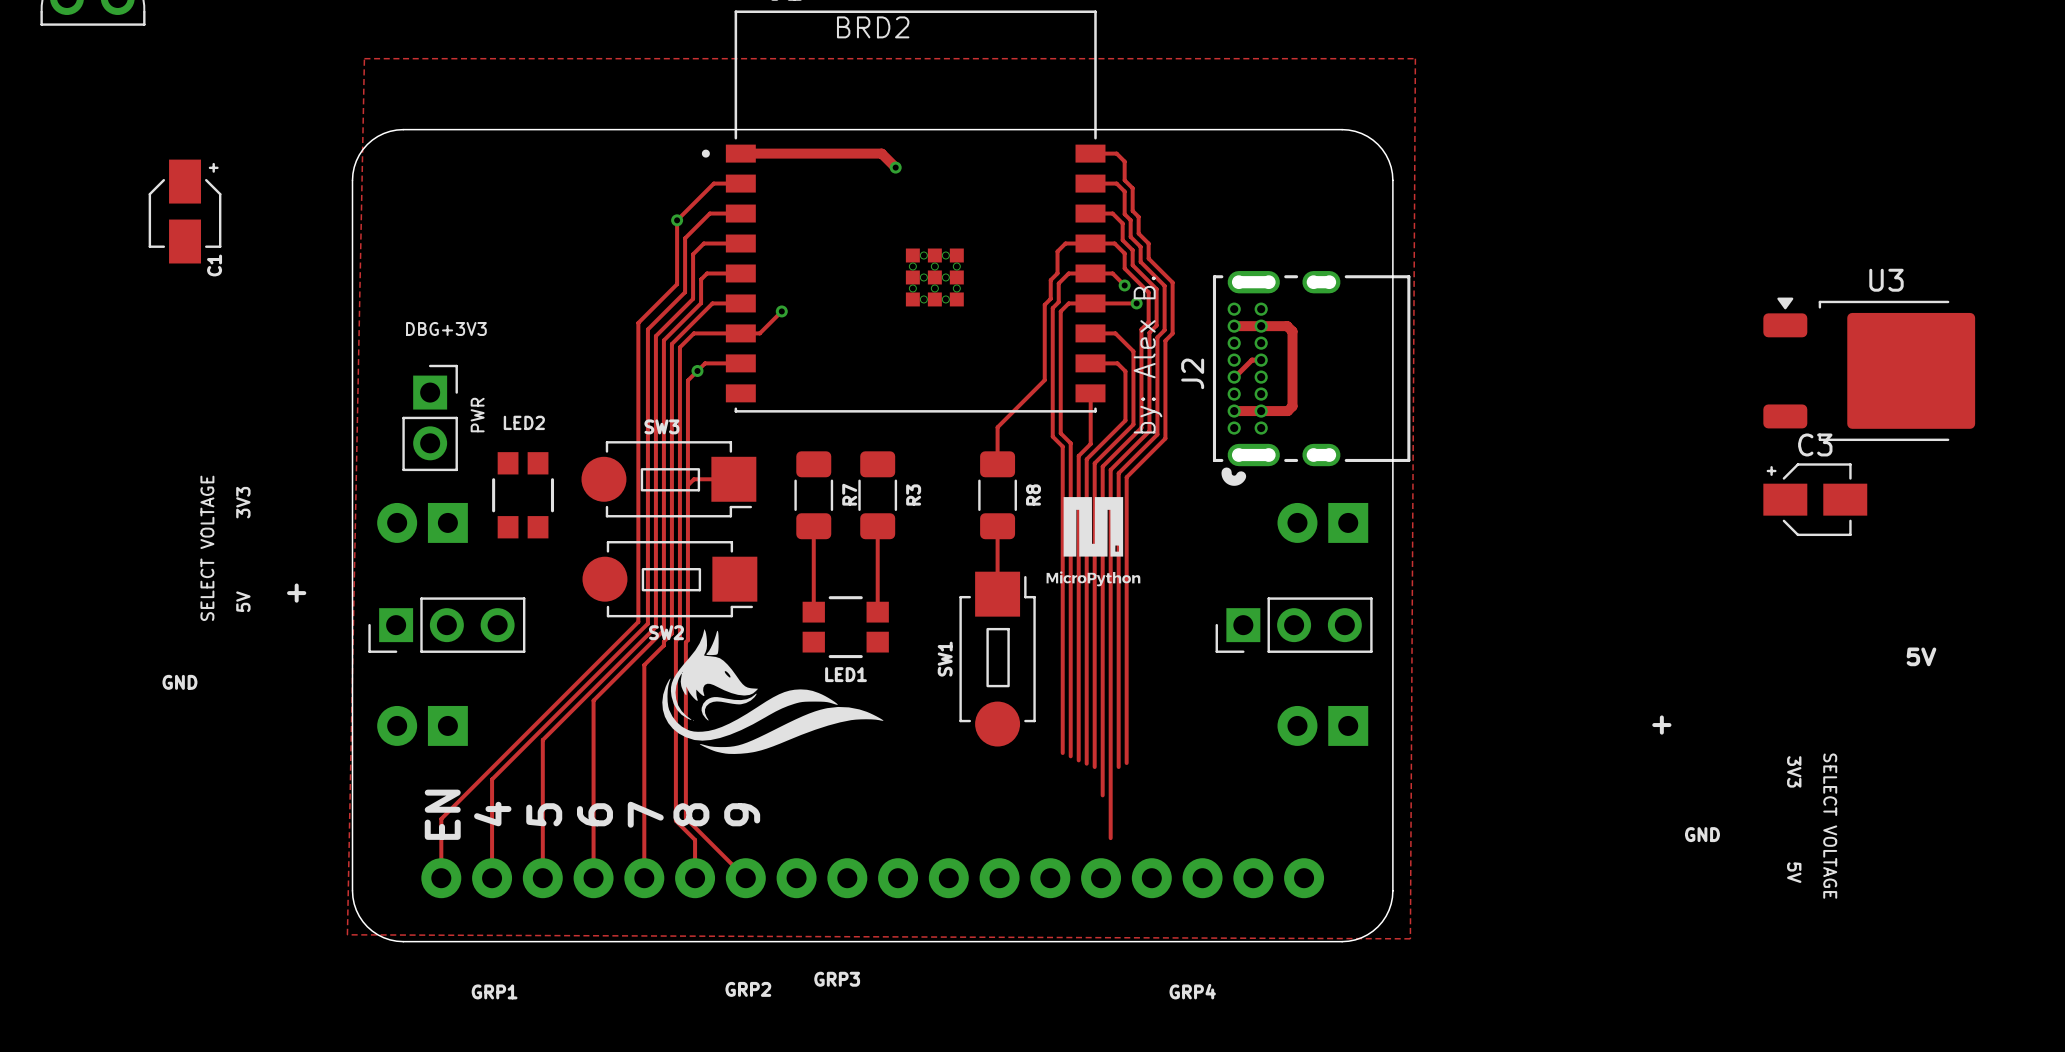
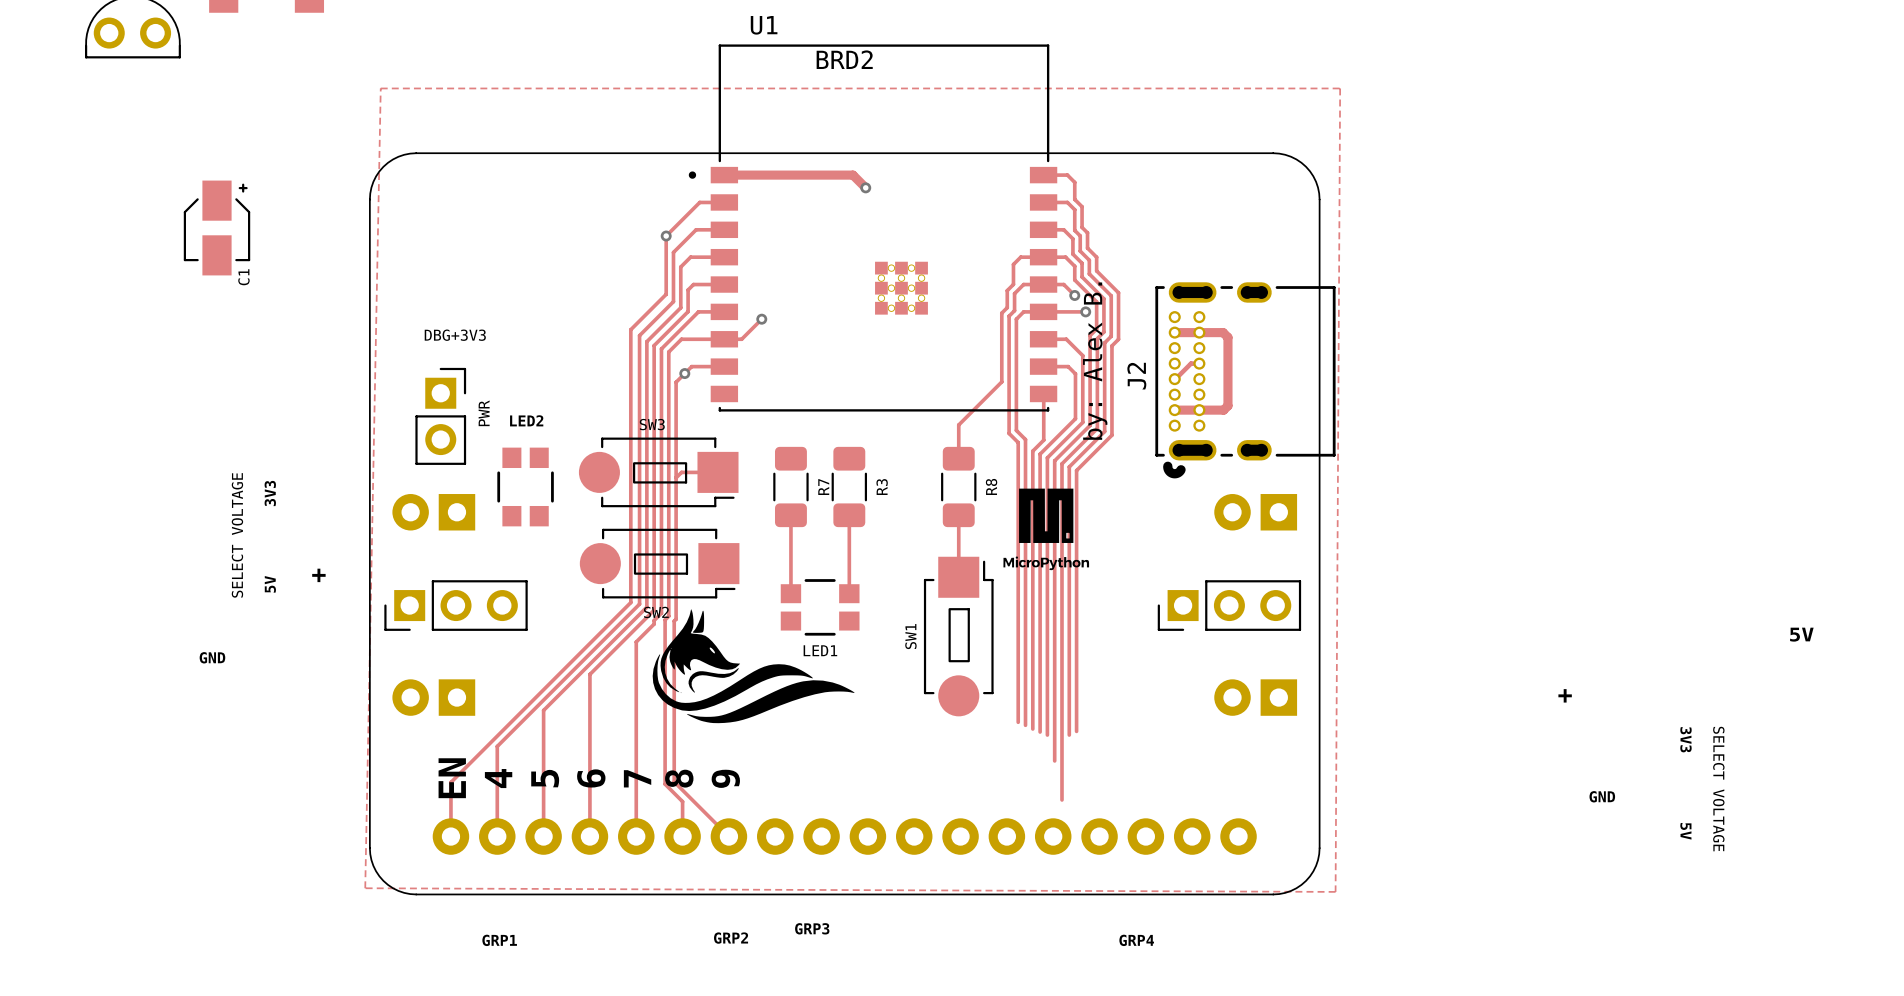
U3: (1869, 369) -> none
C3: (1815, 499) -> none

